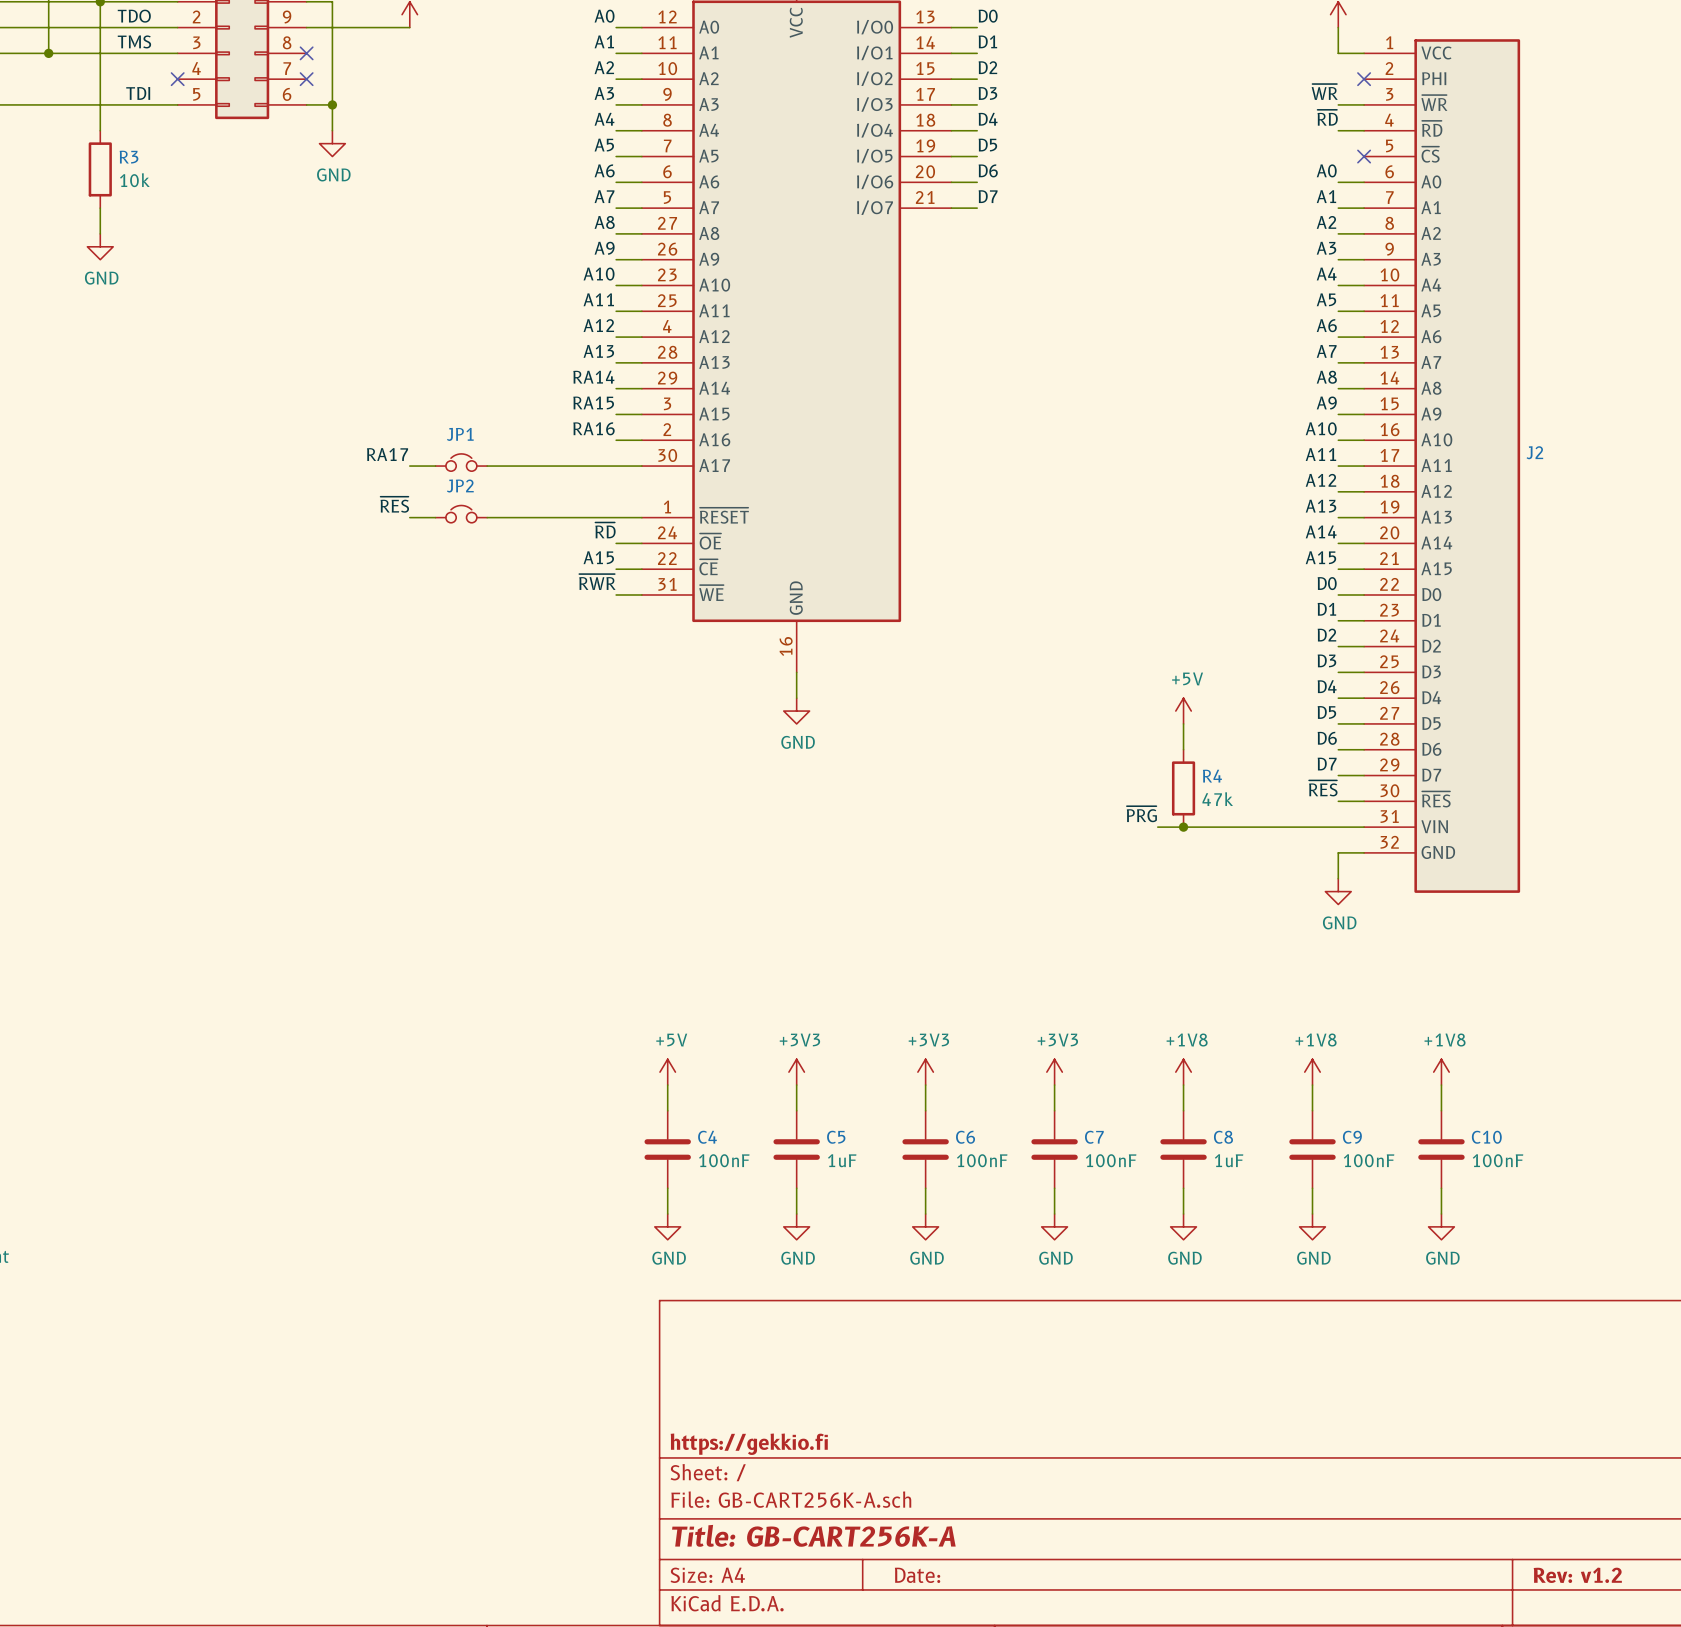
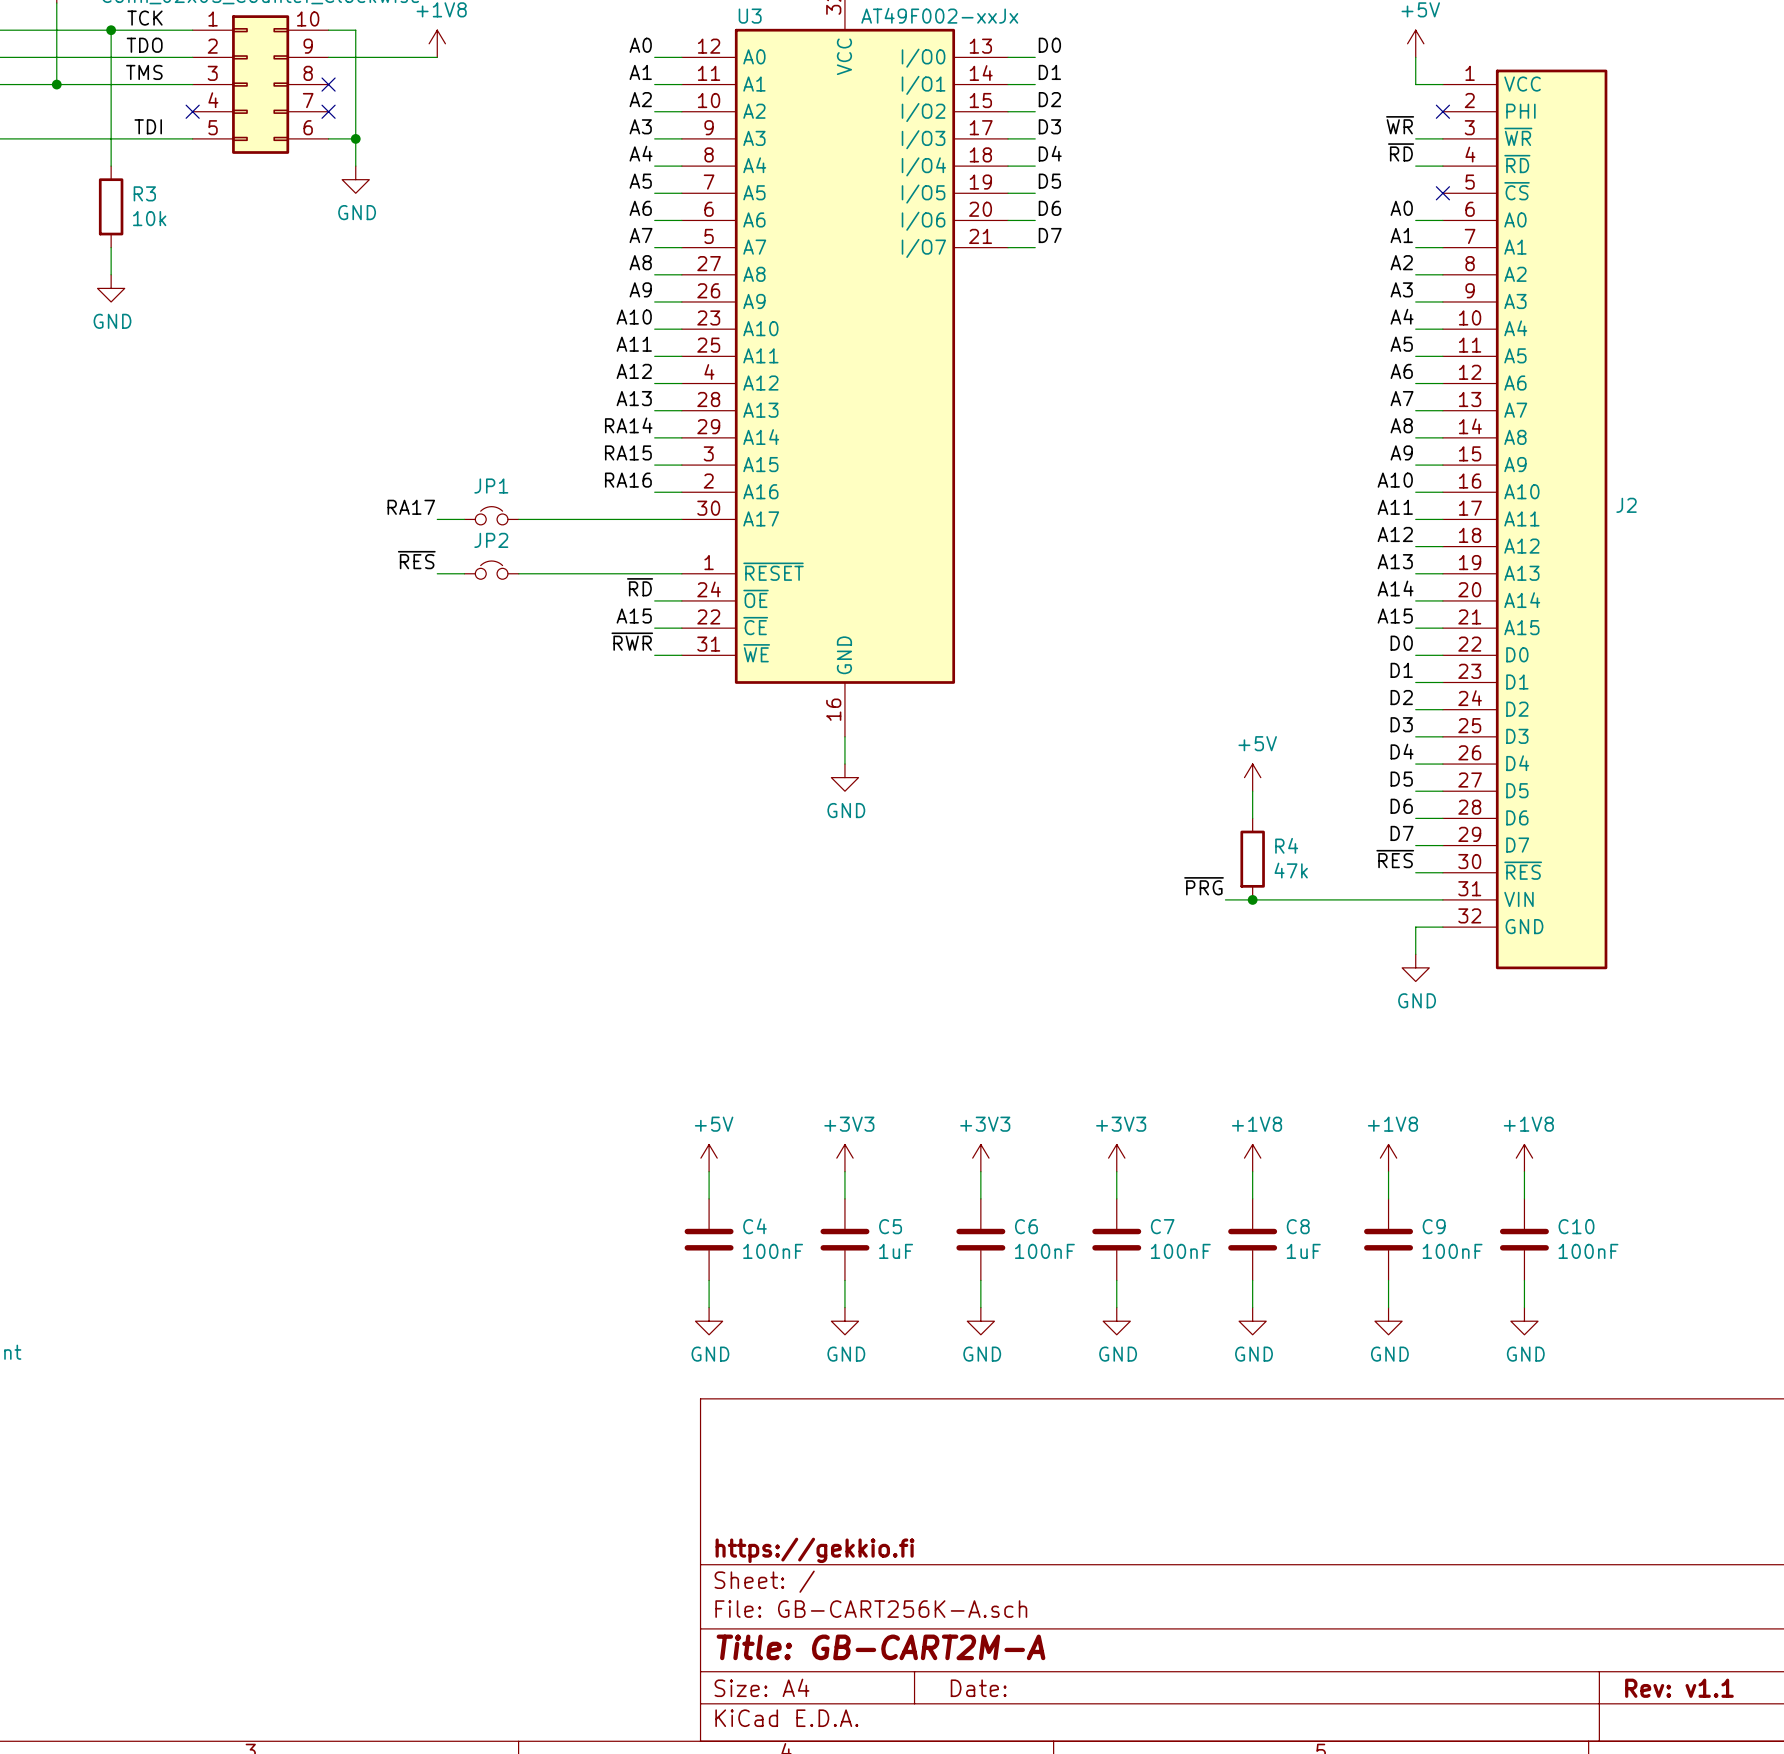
title block: Title: GB-CART256K-A (813, 1535) -> Title: GB-CART2M-A (880, 1647)
title block: Rev: v1.2 (1577, 1575) -> Rev: v1.1 (1679, 1688)

